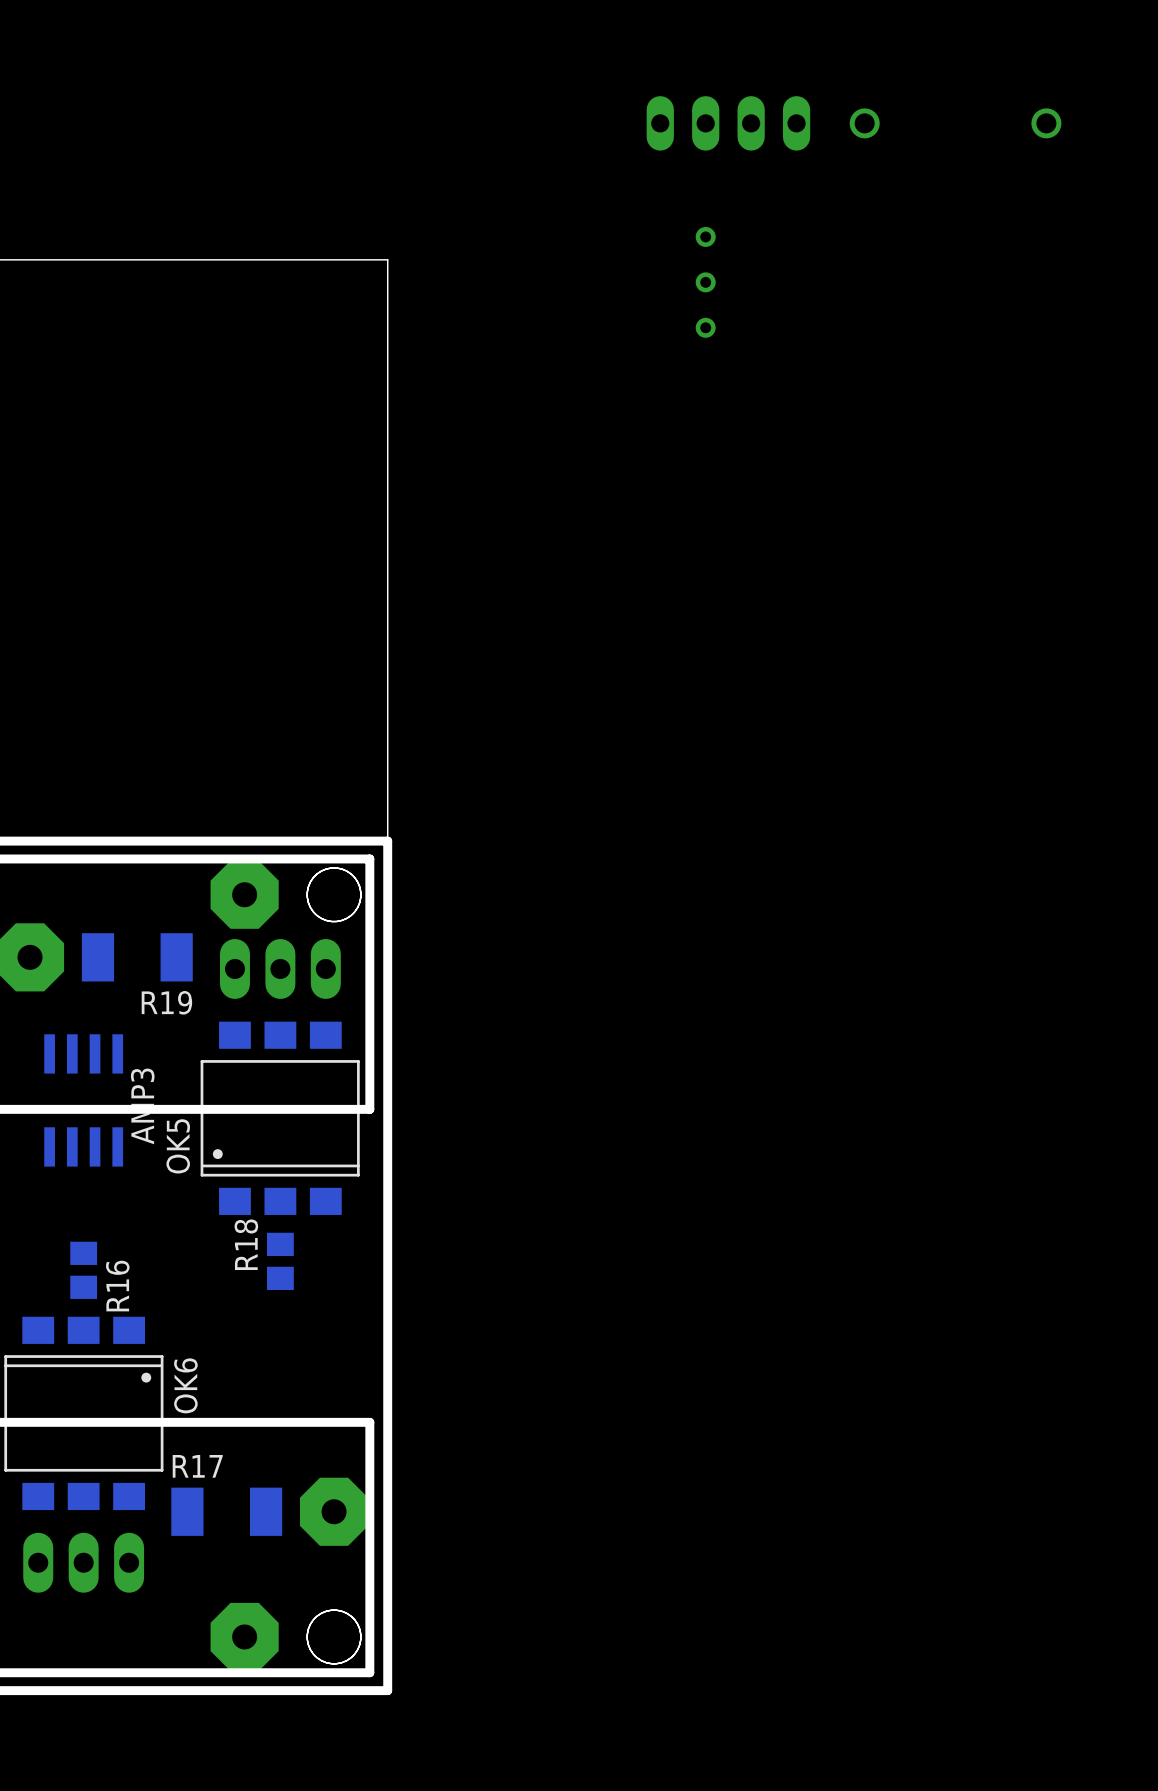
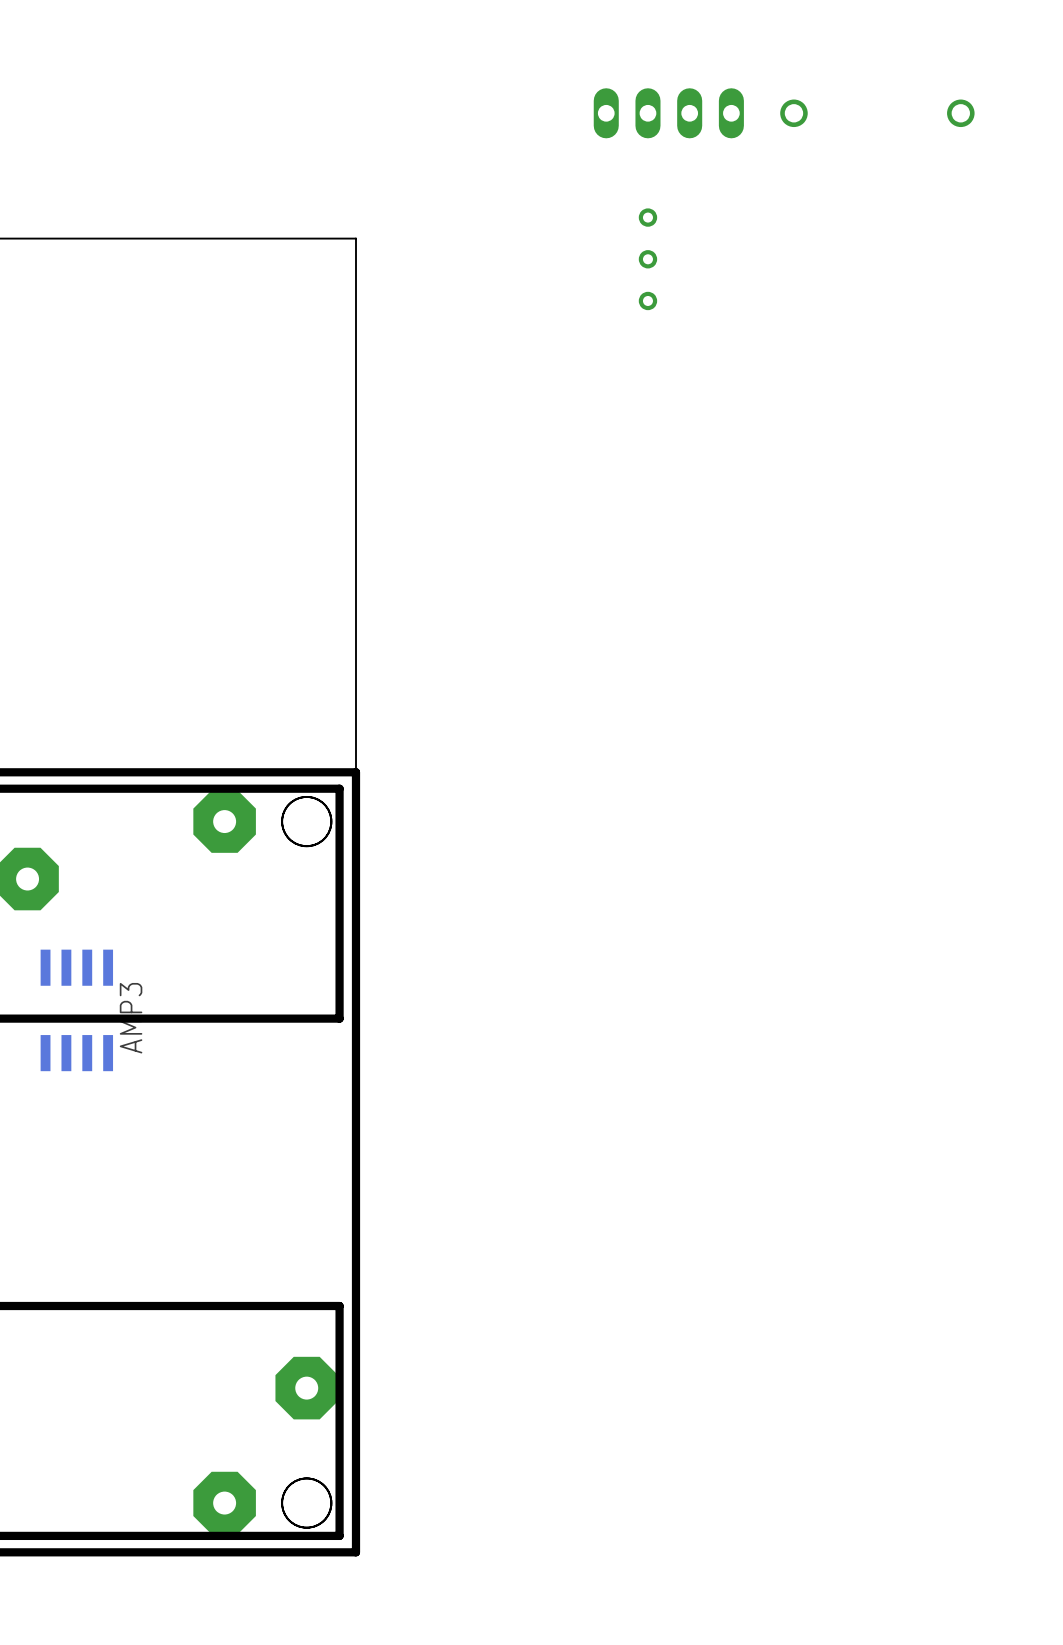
R19: (137, 957) -> none
part: (280, 968) -> none
OK5: (280, 1118) -> none
R18: (280, 1261) -> none
R16: (83, 1270) -> none
OK6: (83, 1413) -> none
R17: (226, 1511) -> none
part: (83, 1562) -> none

